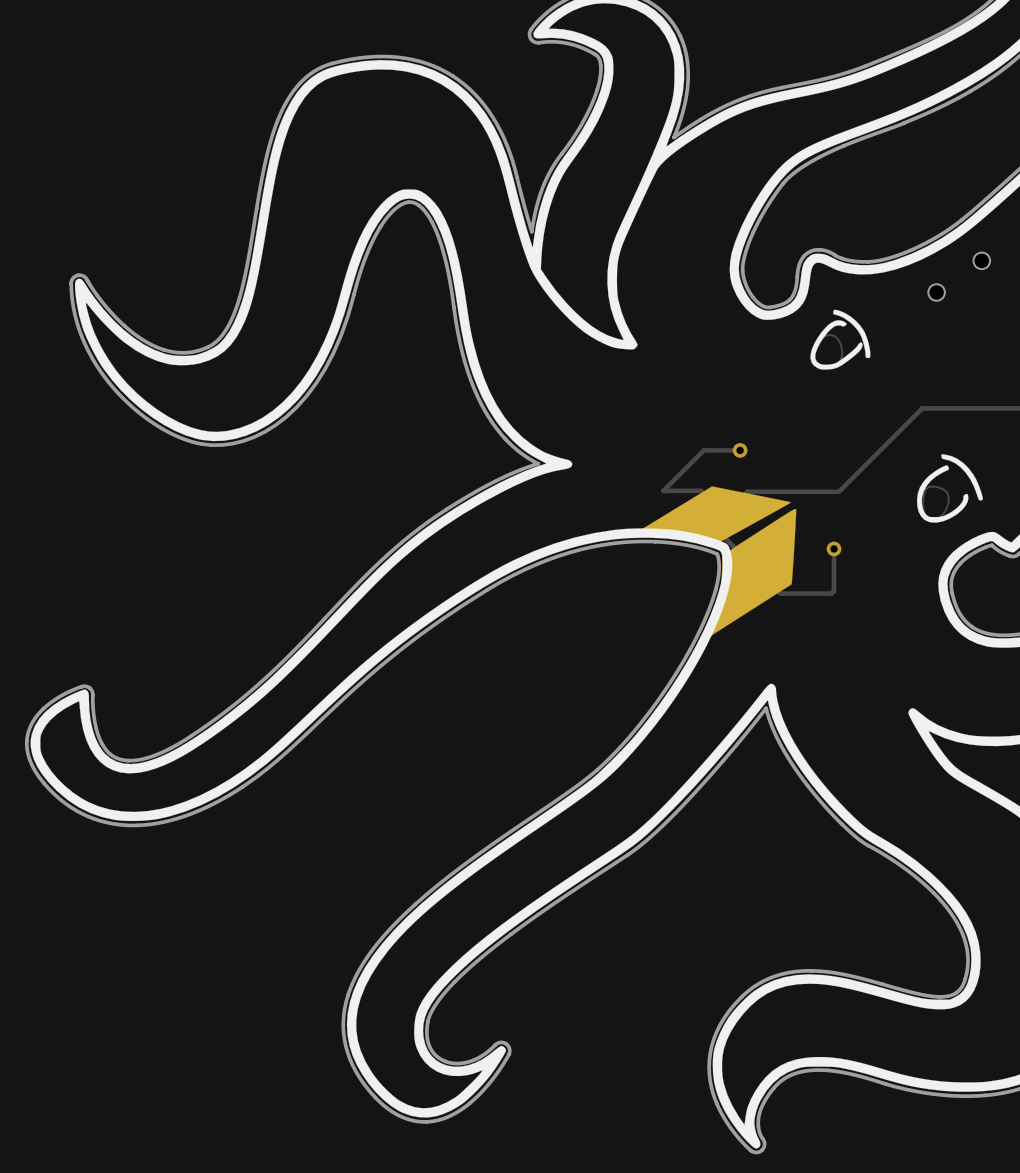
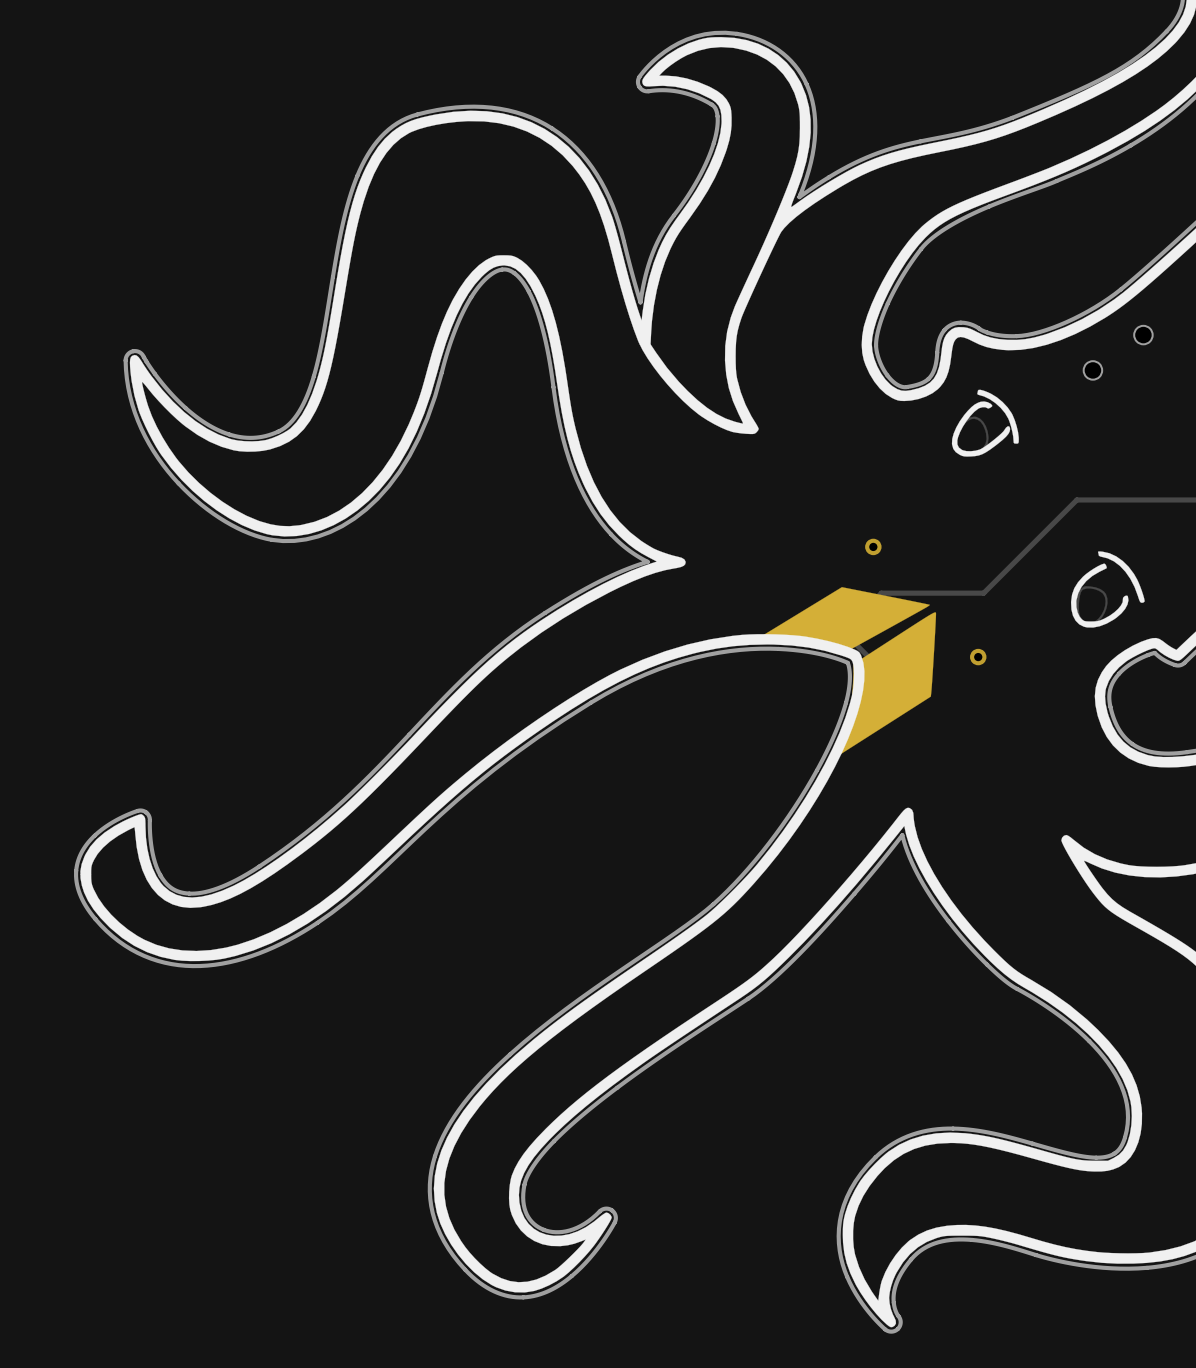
track: (740, 450) (703, 450) (663, 490) (701, 490) (724, 514) -> none
track: (834, 548) (834, 590) (831, 593) (780, 593) (748, 561) -> none

